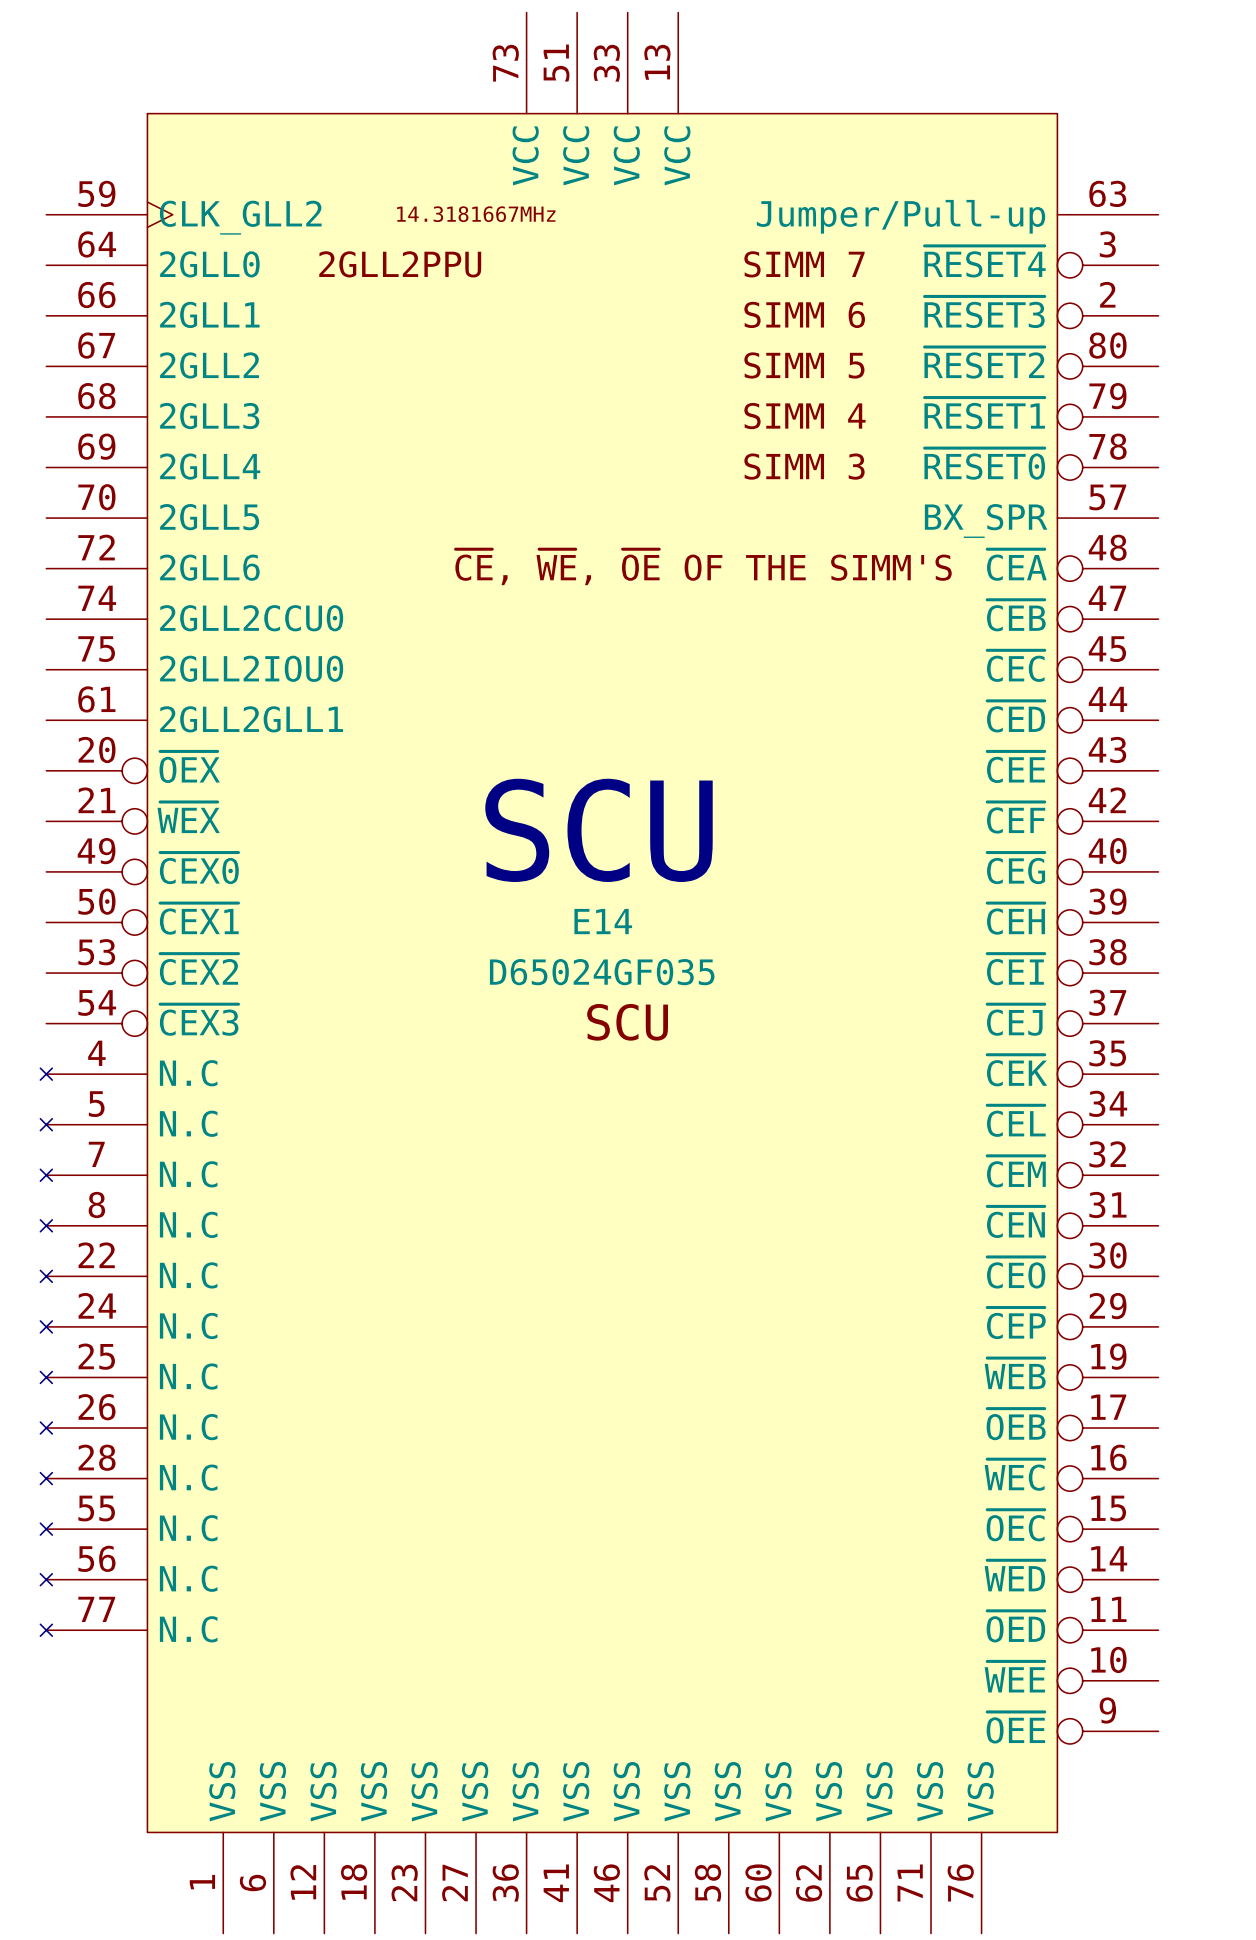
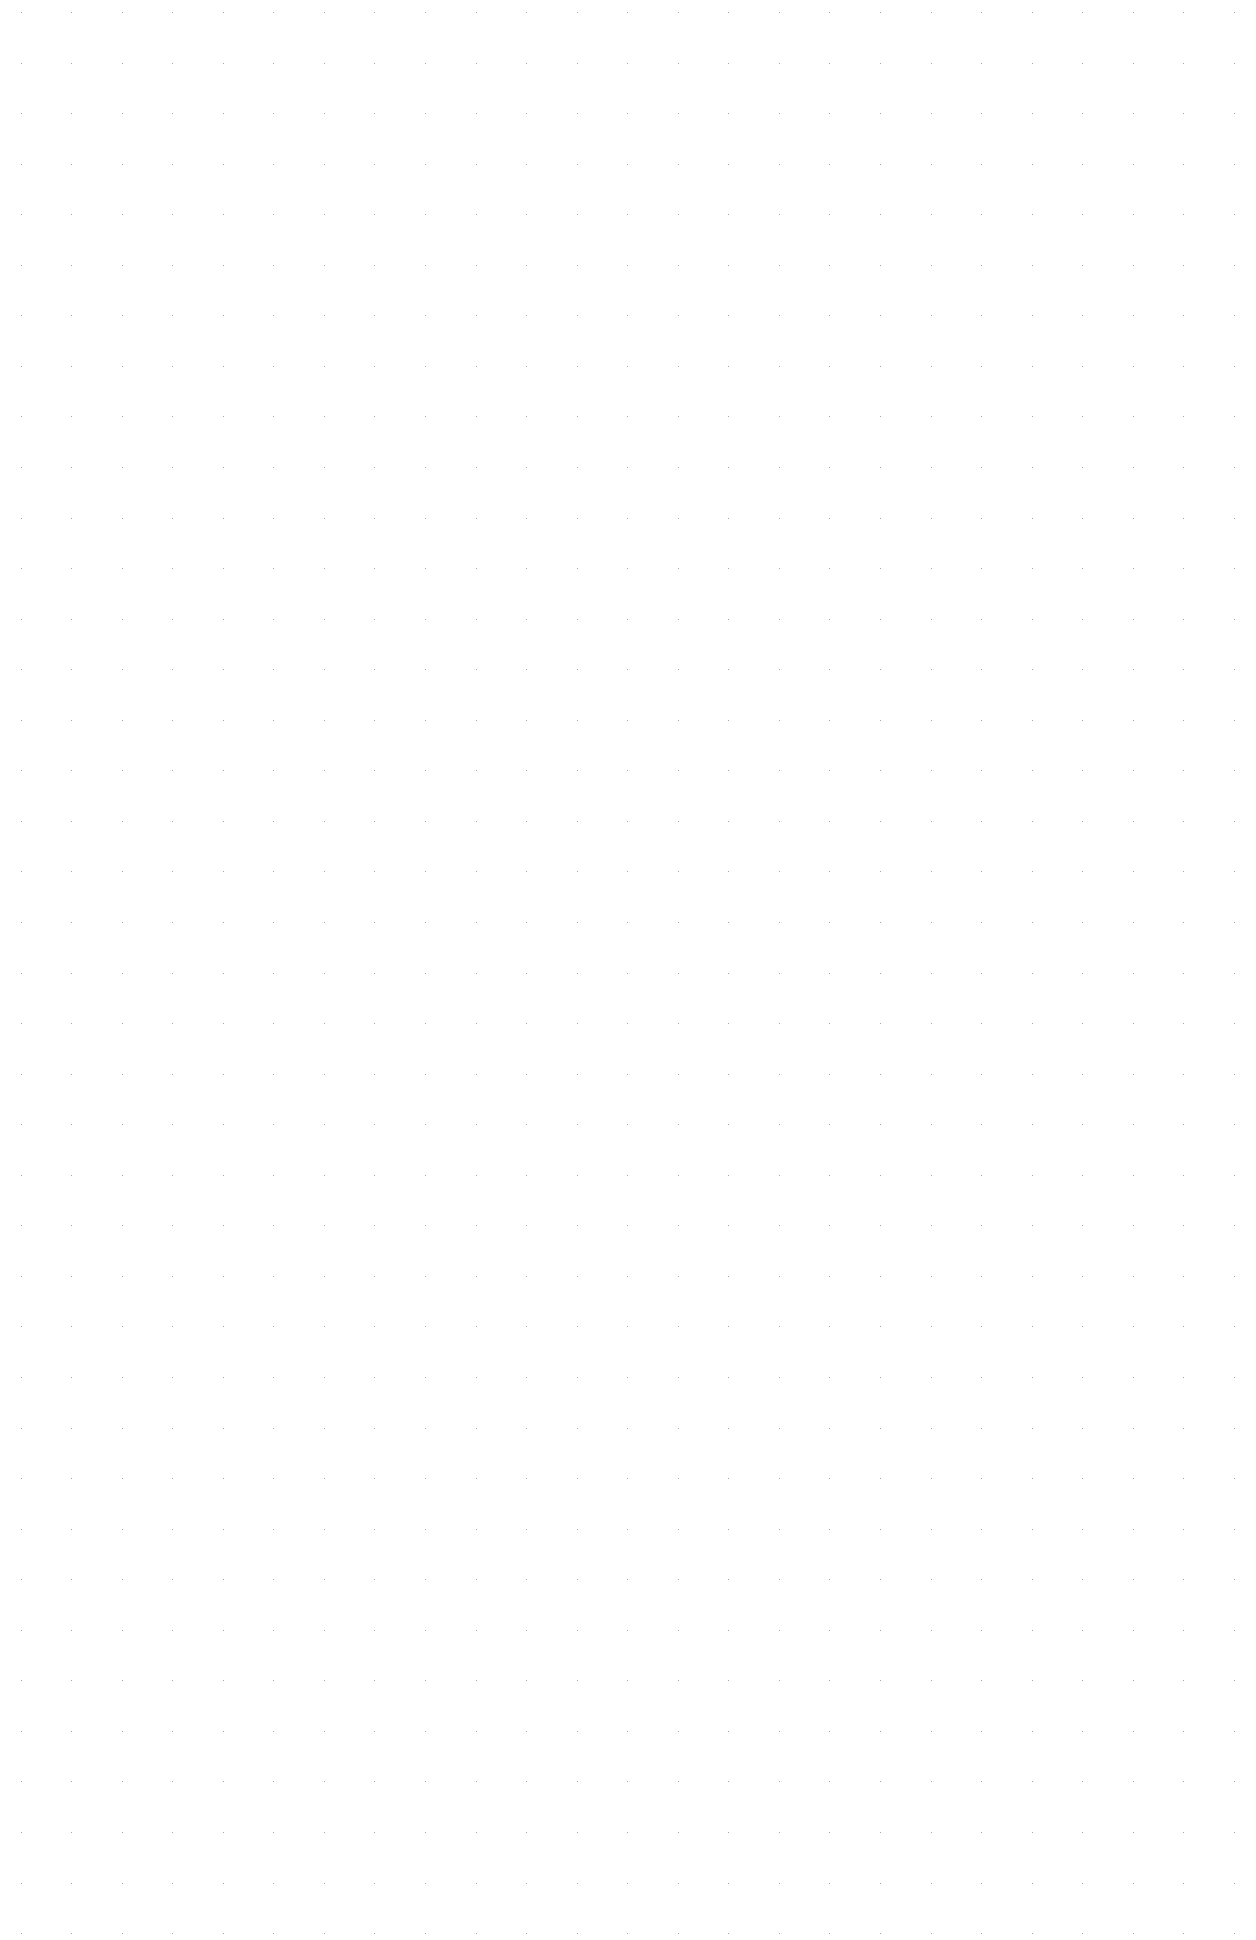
text: SCU (598, 830) -> none
E14: D65024GF035 (599, 973) -> none

